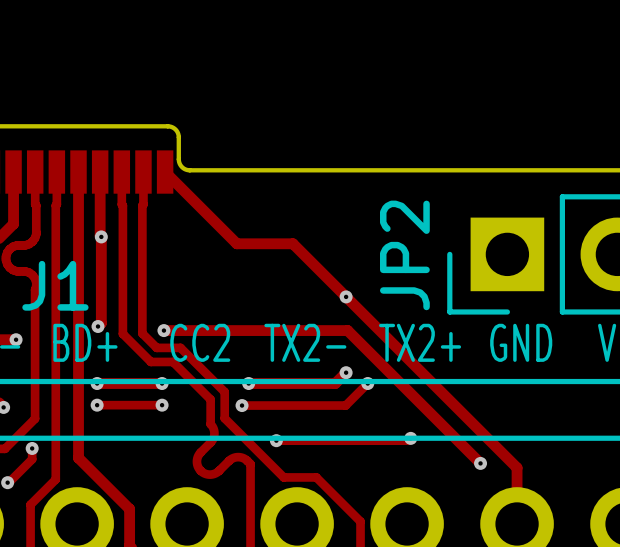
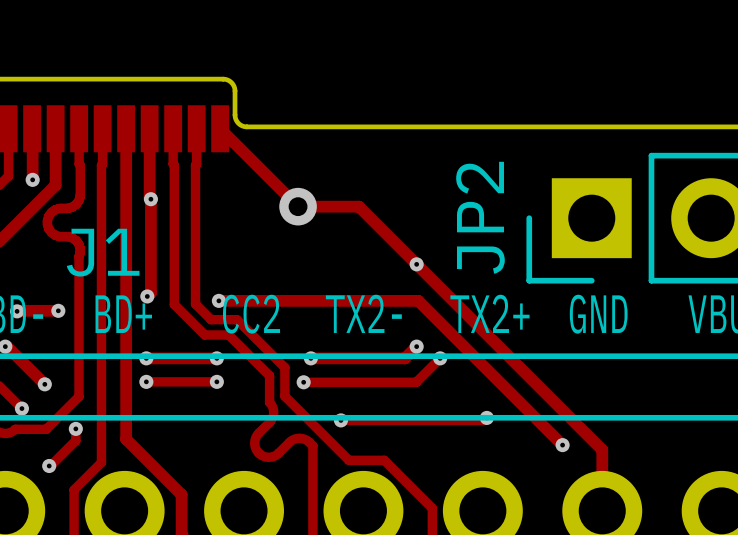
via: none -> (298, 206)

